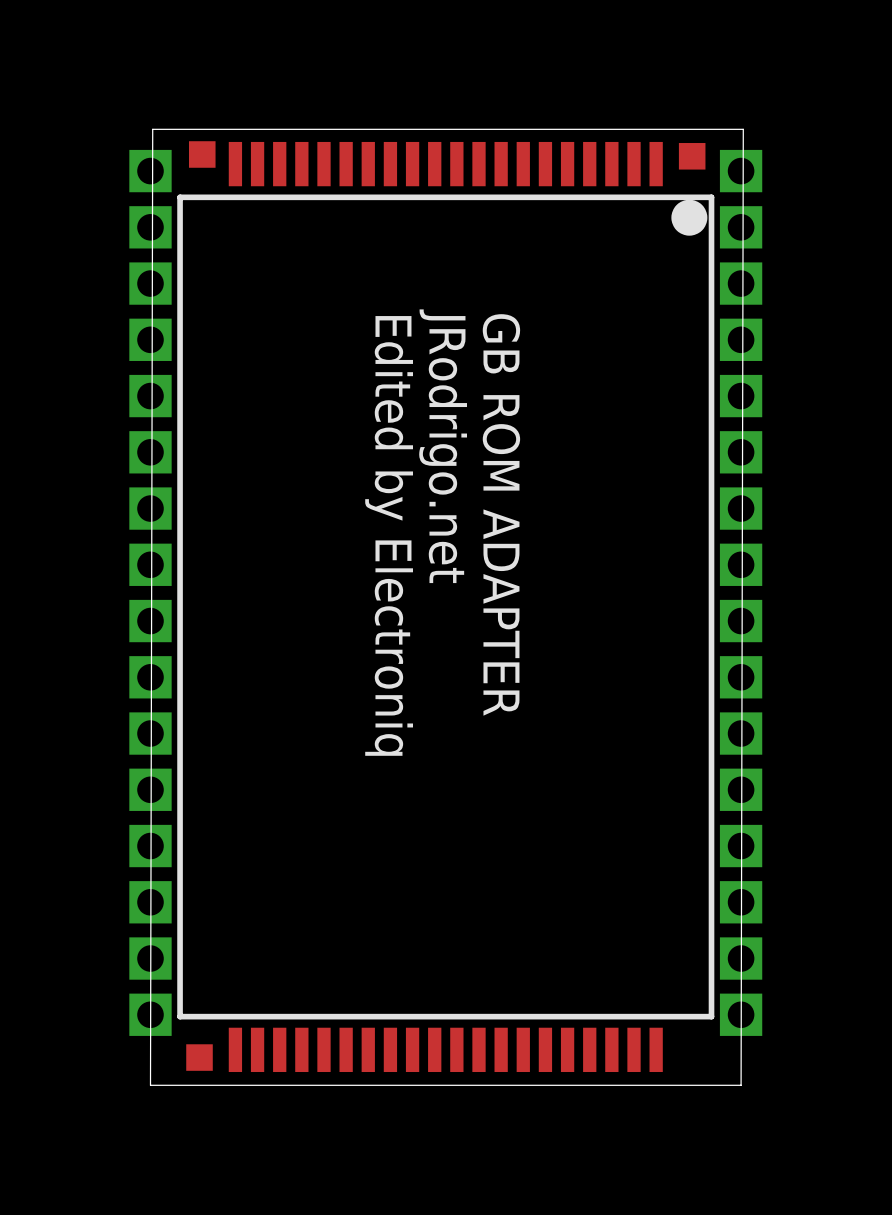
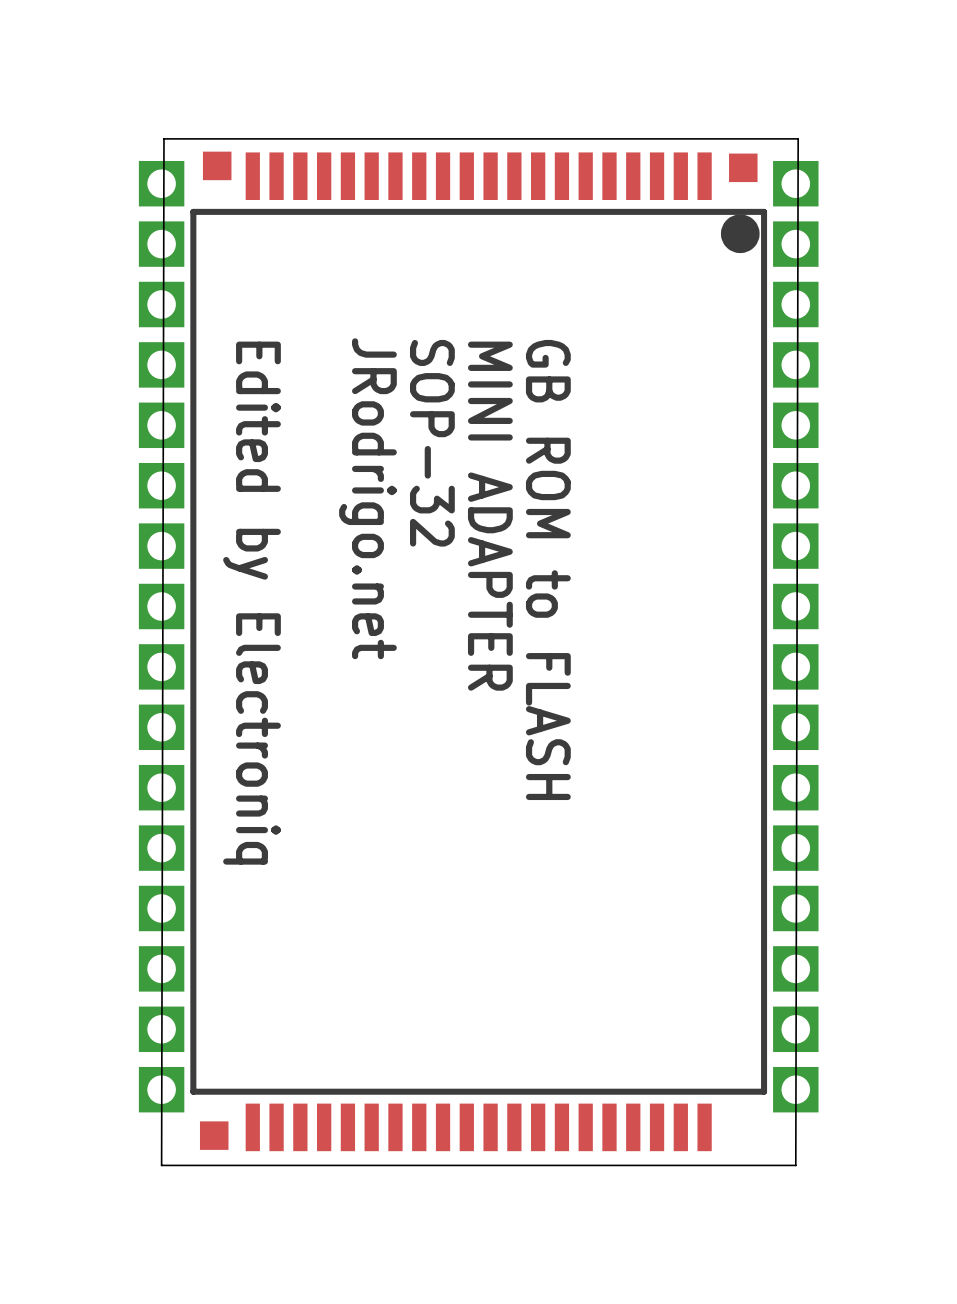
text: none -> SOP-32 (432, 443)
text position: JRodrigo.net (443, 446) -> JRodrigo.net (367, 498)
text: none -> MINI ADAPTER (490, 516)
text: GB ROM ADAPTER (501, 514) -> GB ROM to FLASH (548, 569)
text position: Edited by Electroniq (389, 535) -> Edited by Electroniq (252, 603)

